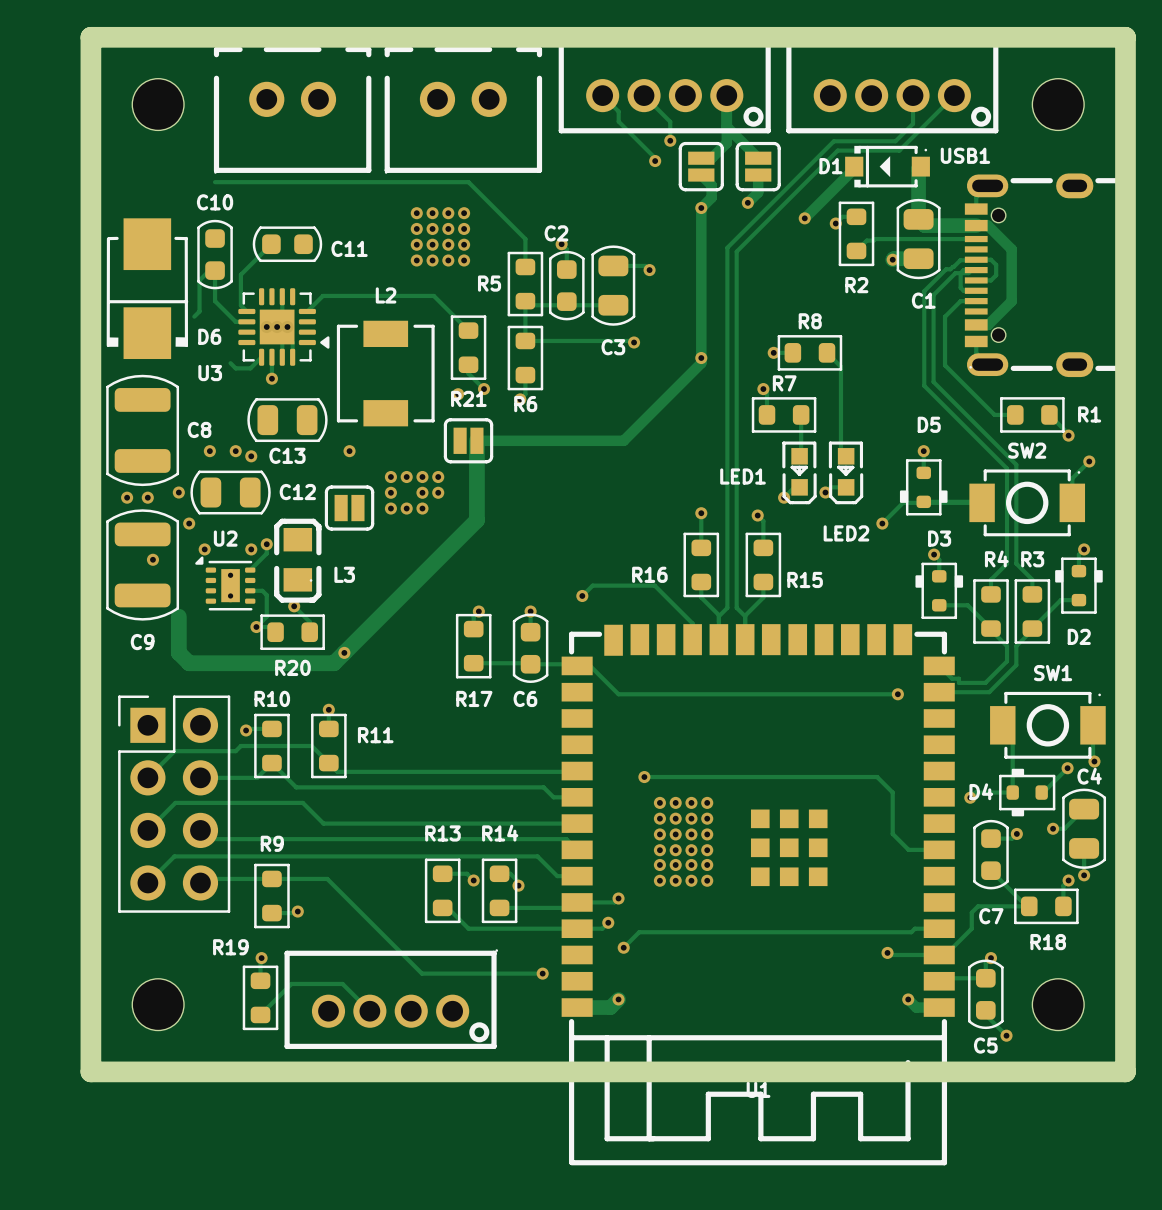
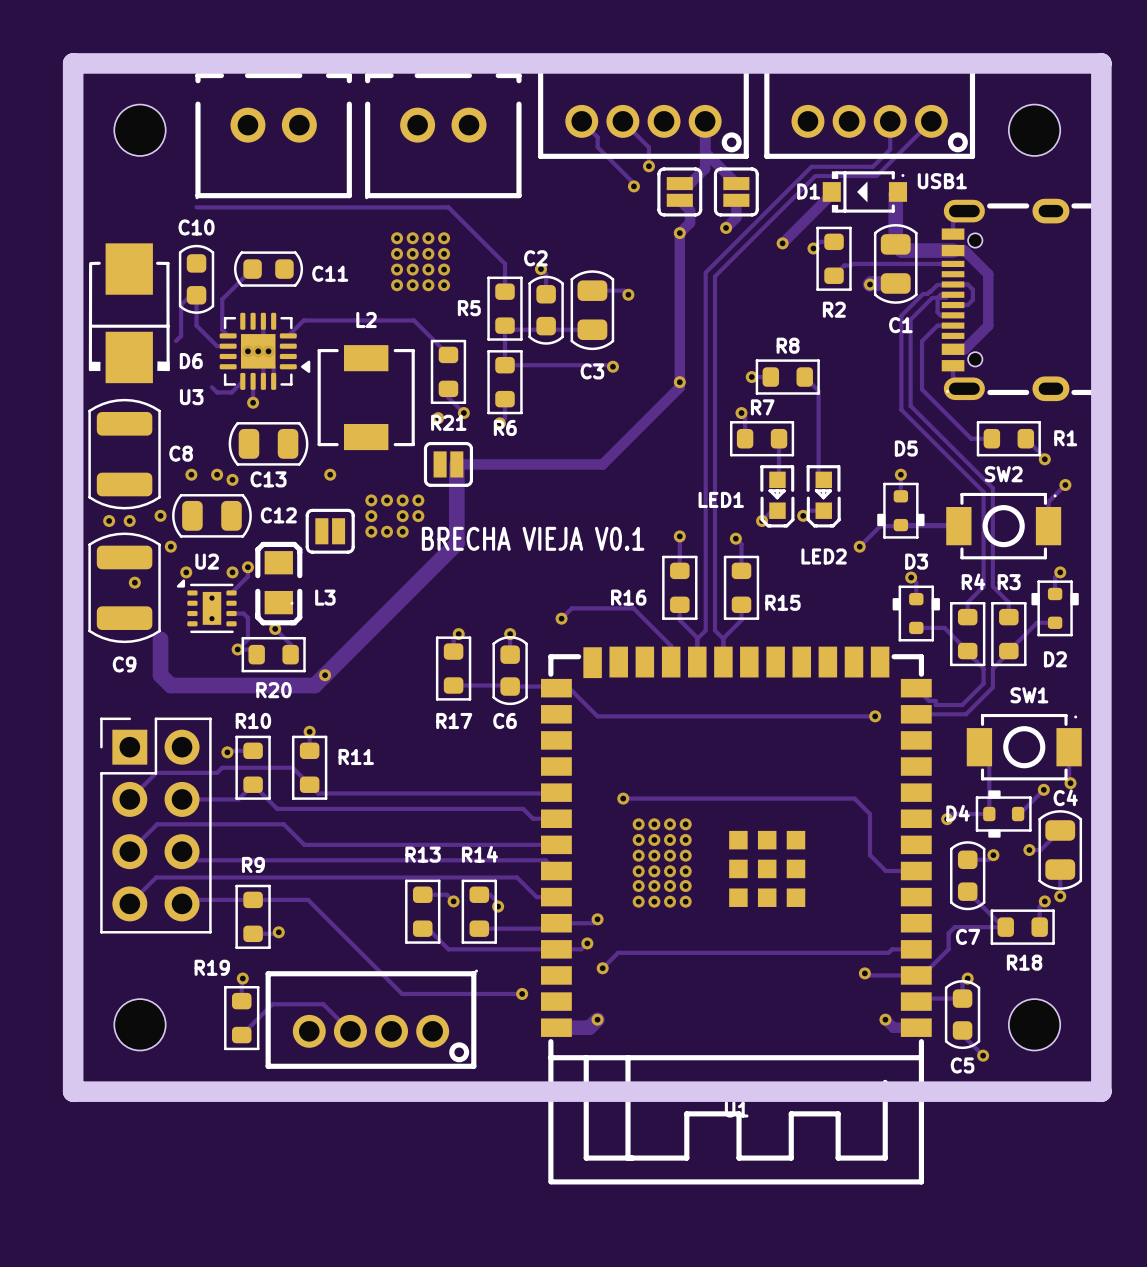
text: none -> BRECHA VIEJA V0.1 (533, 538)

